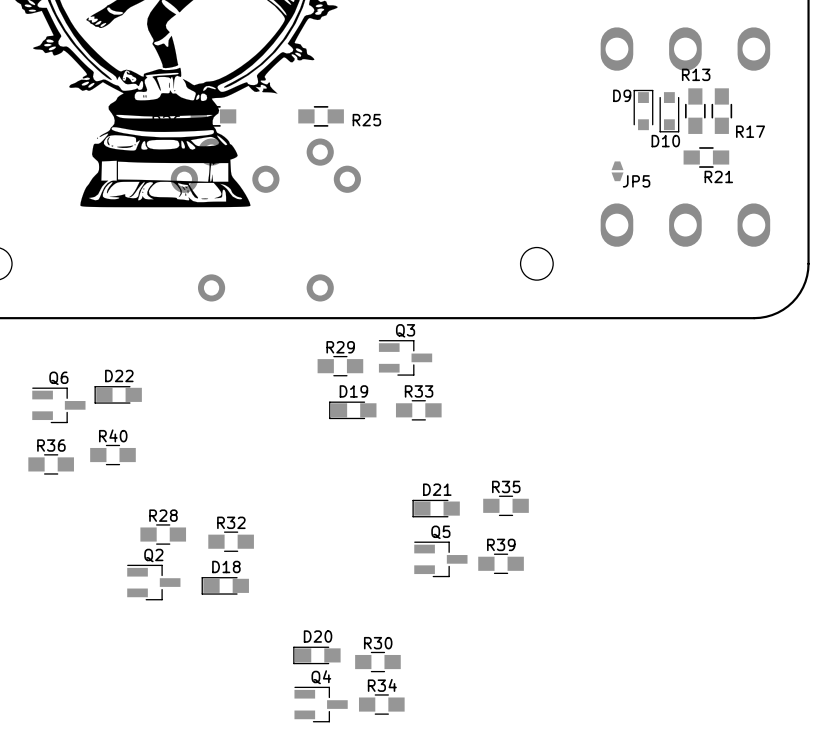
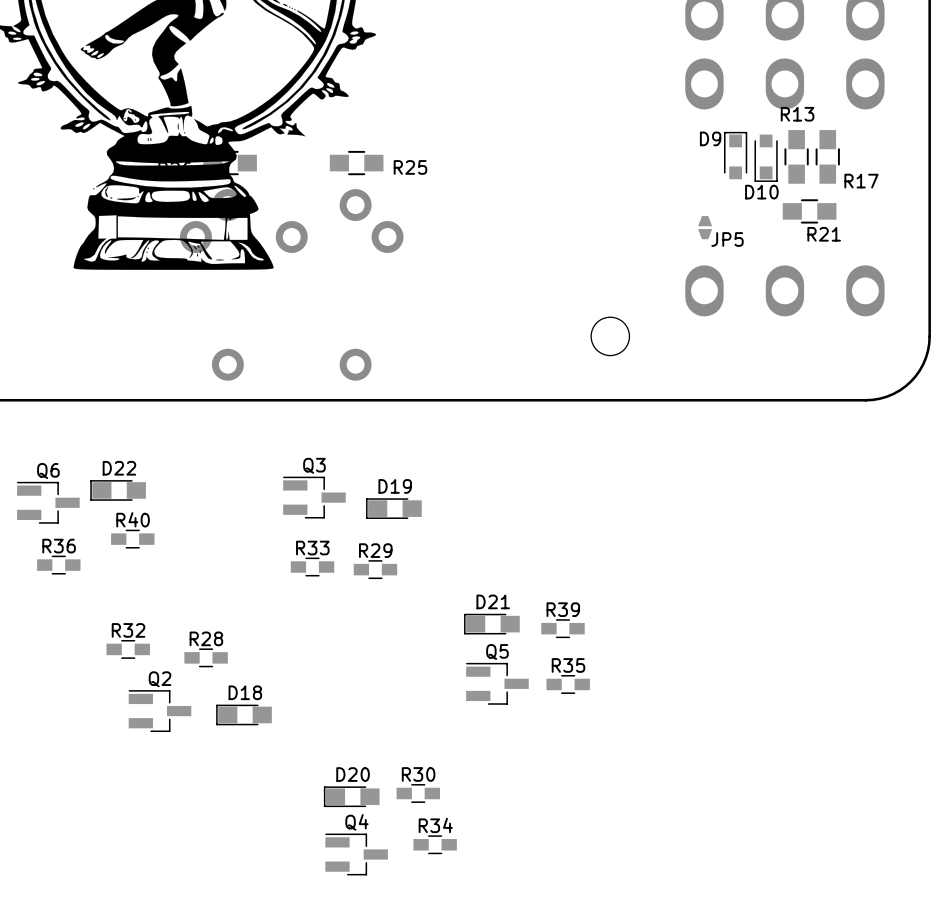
R29 footprint: [317, 355, 364, 377] -> [353, 560, 398, 580]
Q3 position: (405, 357) -> (314, 497)
R33 footprint: [395, 400, 442, 421] -> [290, 557, 335, 577]
R40 footprint: [90, 444, 136, 466] -> [111, 529, 155, 549]
R36 footprint: [28, 454, 74, 475] -> [37, 555, 81, 575]
R35 footprint: [483, 495, 529, 517] -> [546, 675, 590, 694]
R28 footprint: [140, 524, 187, 545] -> [184, 648, 228, 668]
R32 footprint: [208, 531, 254, 552] -> [106, 639, 150, 659]
R39 footprint: [478, 553, 524, 575] -> [541, 619, 585, 639]
R30 footprint: [355, 651, 401, 673] -> [396, 784, 441, 803]
R34 footprint: [358, 694, 405, 715] -> [413, 835, 457, 855]

